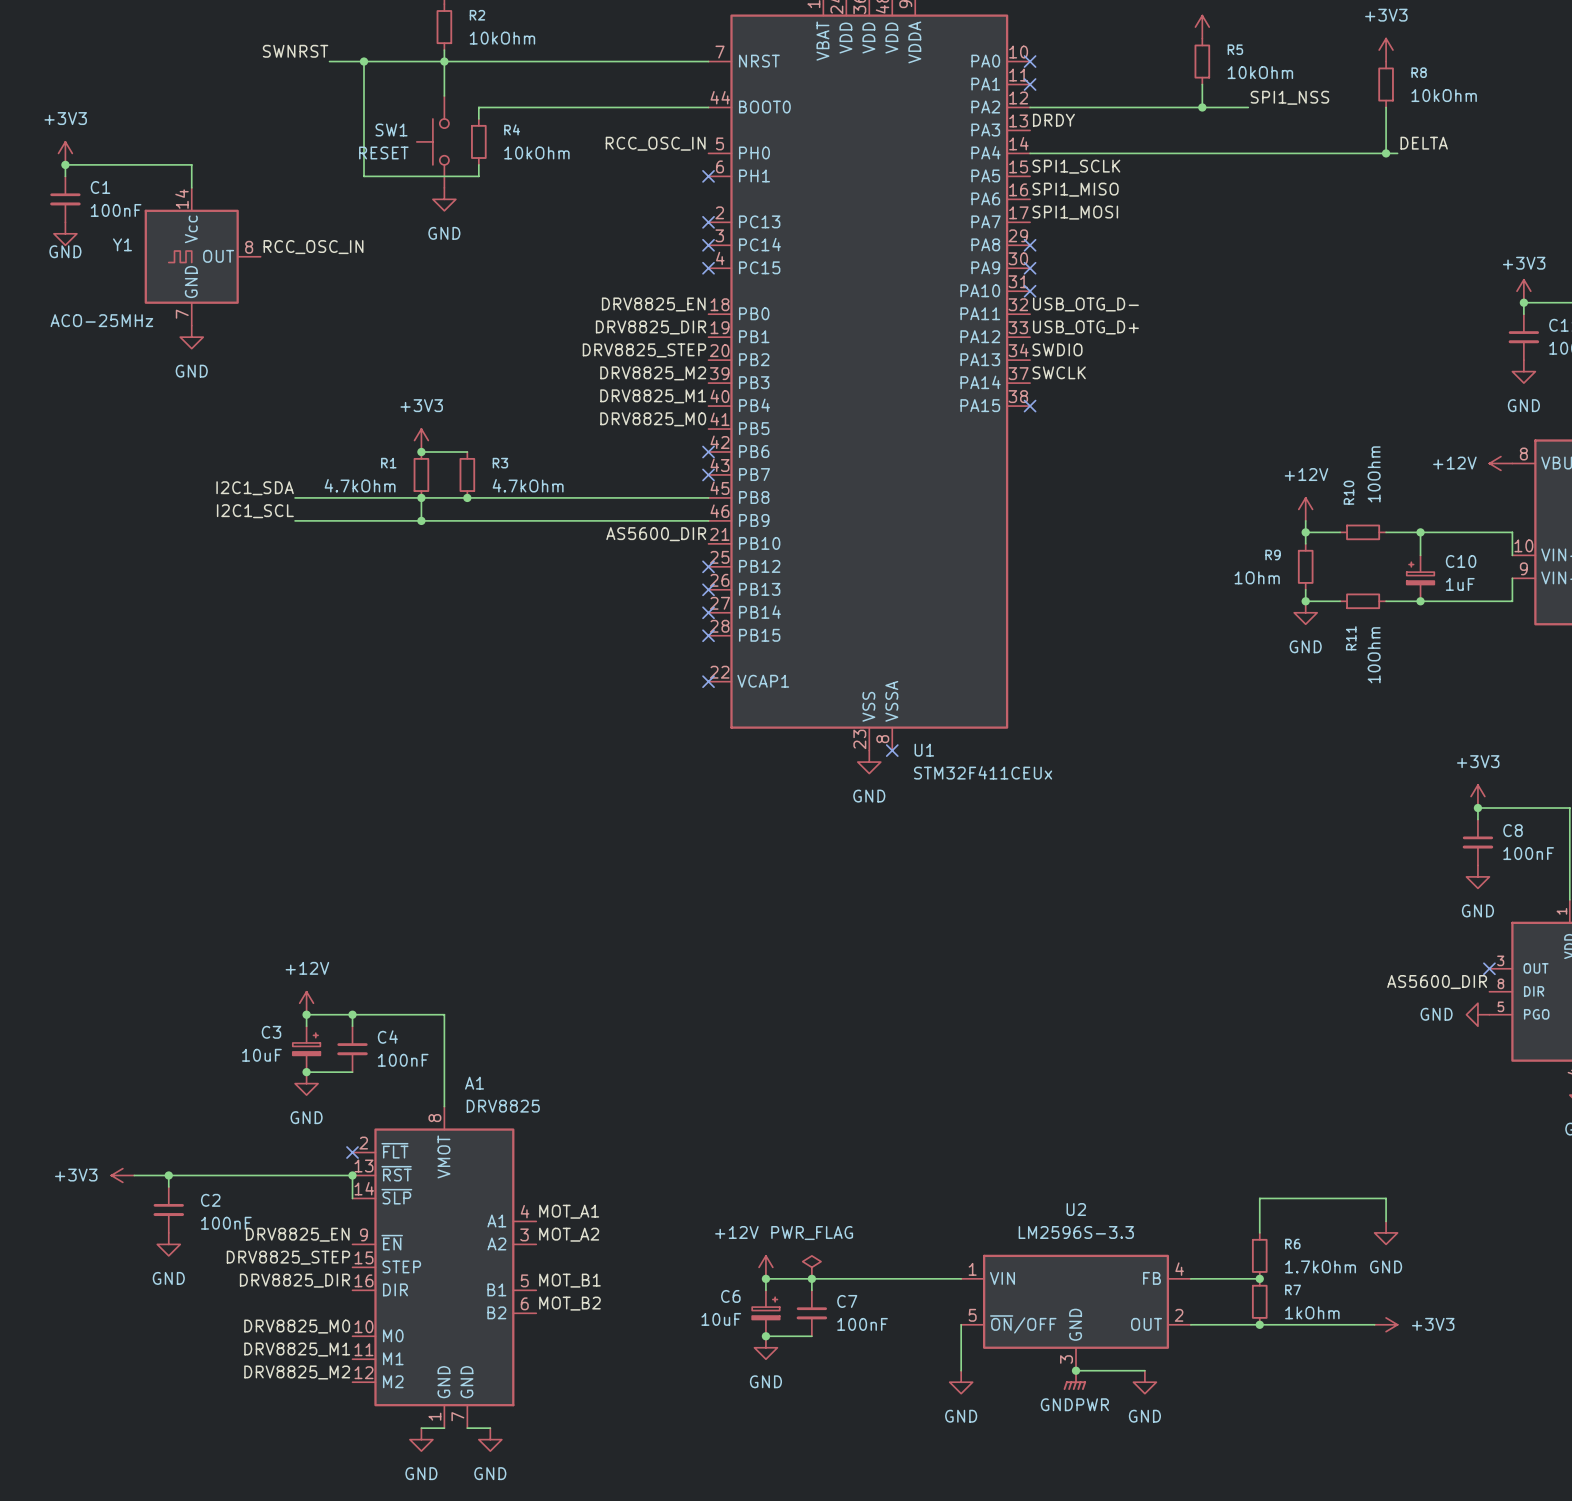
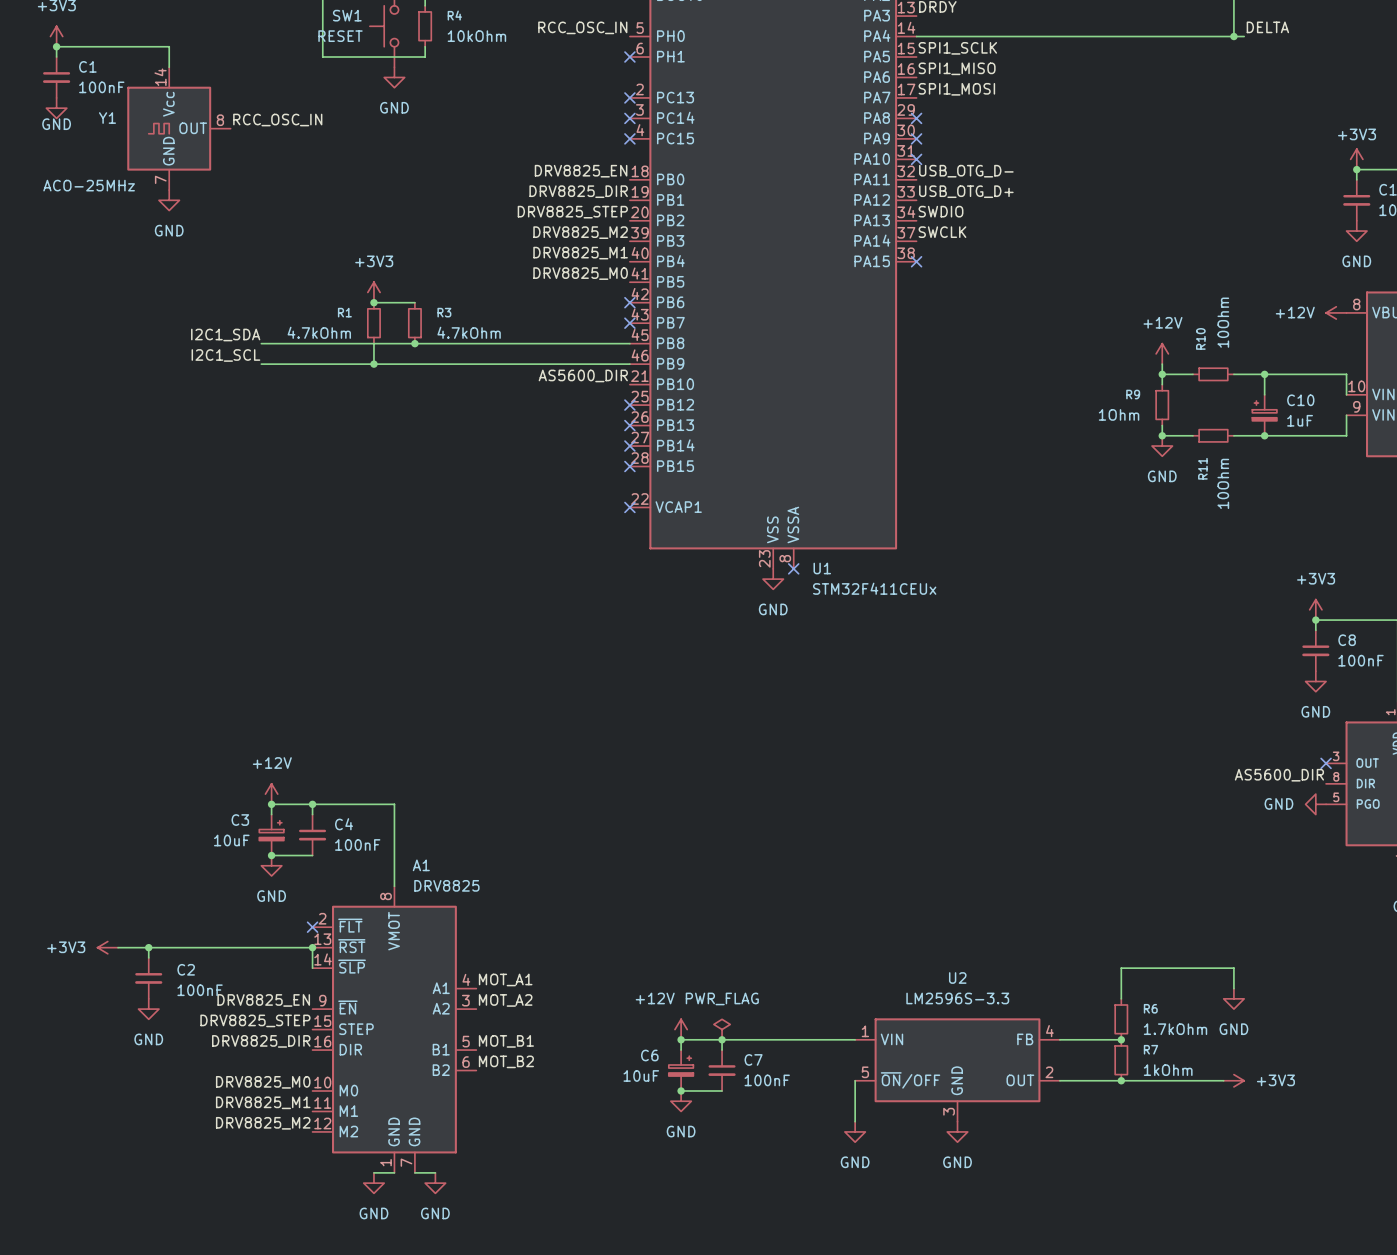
junction: (421, 497) -> none
wire: (1076, 1370) (1144, 1370) -> none
junction: (1076, 1370) -> none
power symbol: GNDPWR (1074, 1380) -> GND (957, 1131)
power symbol: GND (1144, 1382) -> none

